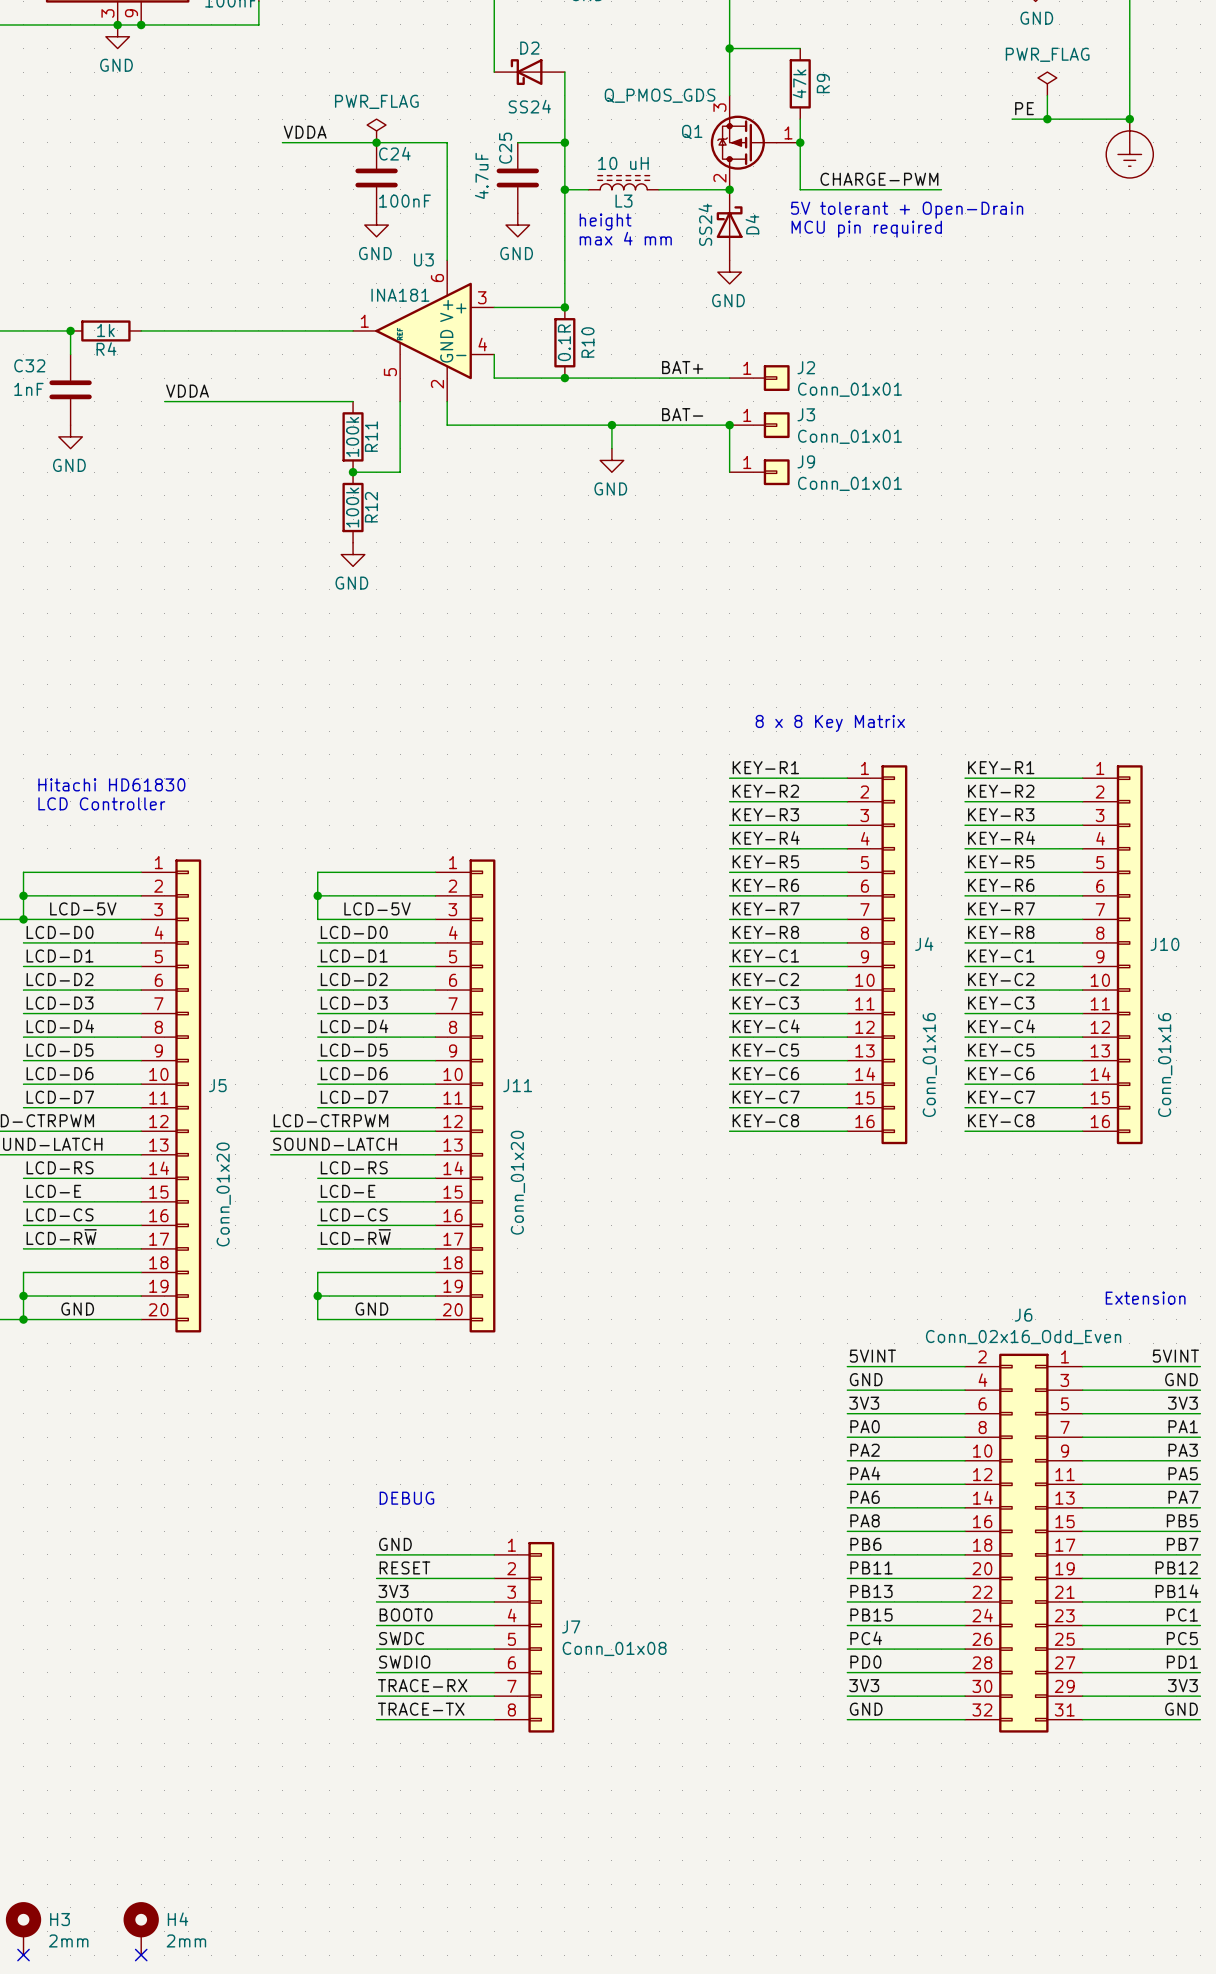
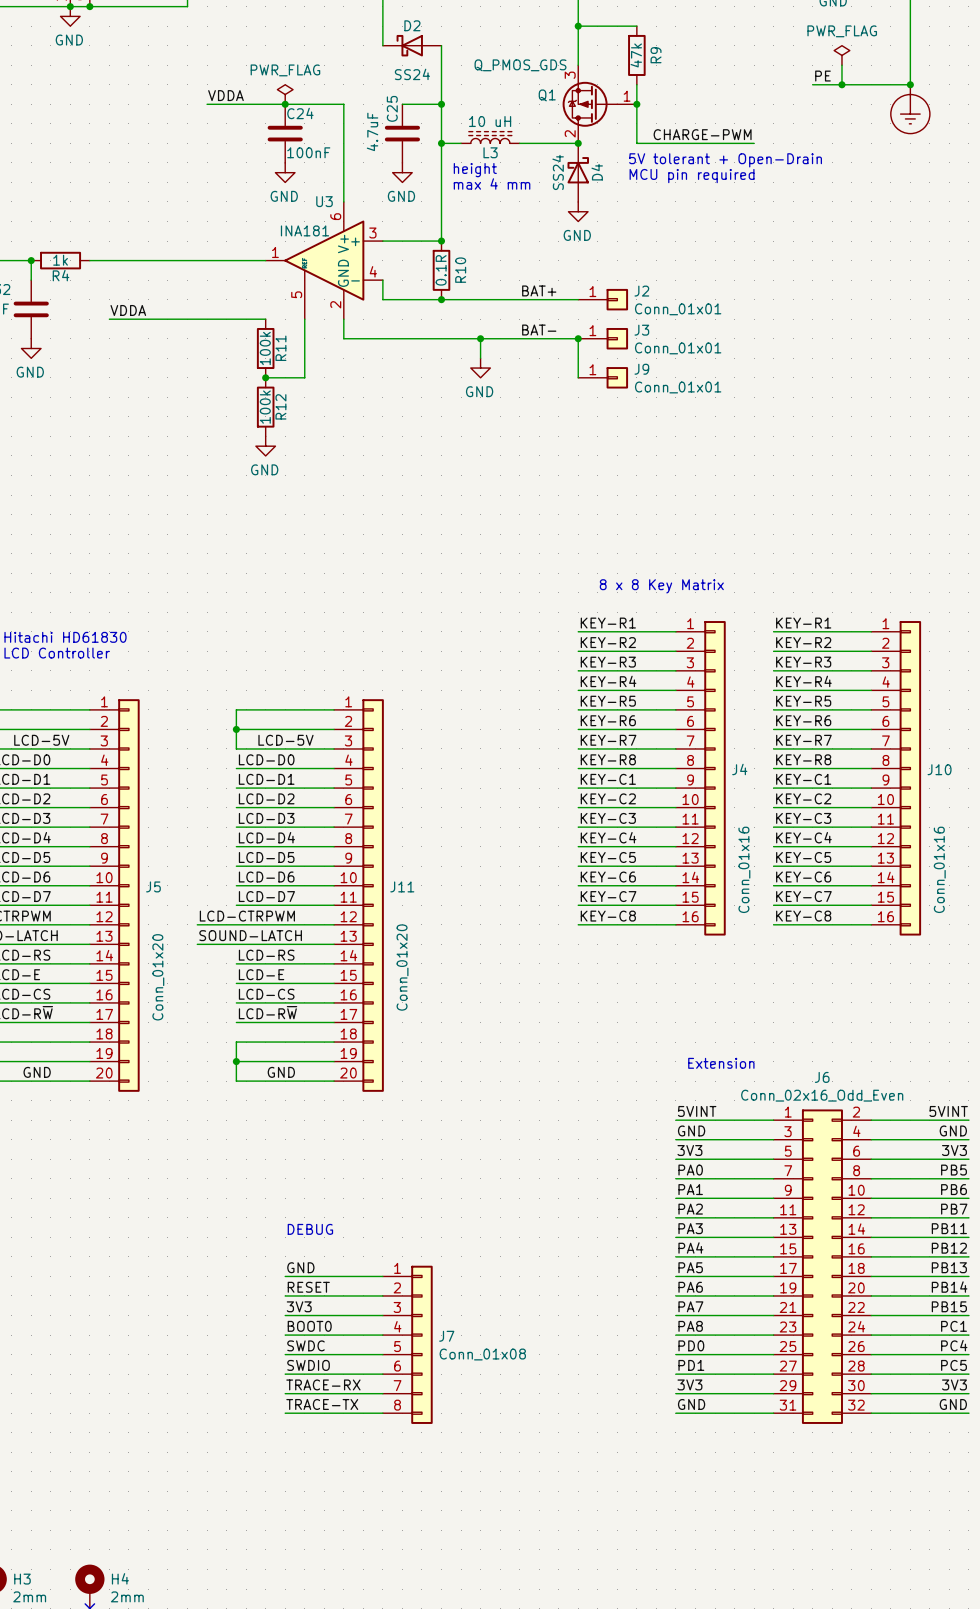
text: none -> Extension (721, 1063)
text: Extension (1145, 1298) -> none
label: PA1 (1183, 1426) -> PB5 (954, 1170)
label: PA2 (865, 1450) -> PA1 (690, 1189)
label: PA3 (1183, 1450) -> PB6 (954, 1189)
label: PA4 (865, 1473) -> PA2 (690, 1209)
label: PA5 (1183, 1473) -> PB7 (954, 1209)
label: PA6 (865, 1497) -> PA3 (690, 1228)
label: PA7 (1183, 1497) -> PB11 (949, 1228)
label: PA8 (865, 1520) -> PA4 (690, 1247)
label: PB5 (1182, 1520) -> PB12 (949, 1248)
J6 flip: as is (1023, 1543) -> left-right (822, 1266)
label: PB6 (865, 1544) -> PA5 (690, 1267)
label: PB7 (1182, 1544) -> PB13 (949, 1267)
label: PB11 (871, 1567) -> PA6 (690, 1287)
label: PB12 (1176, 1567) -> PB14 (949, 1287)
label: PB13 (871, 1591) -> PA7 (690, 1306)
label: PB14 (1177, 1591) -> PB15 (949, 1306)
label: PB15 (871, 1615) -> PA8 (690, 1326)
label: PC4 (866, 1638) -> PD0 (691, 1345)
label: PC5 (1182, 1638) -> PC4 (954, 1345)
label: PD0 (865, 1662) -> PD1 (691, 1365)
label: PD1 (1182, 1662) -> PC5 (954, 1365)

